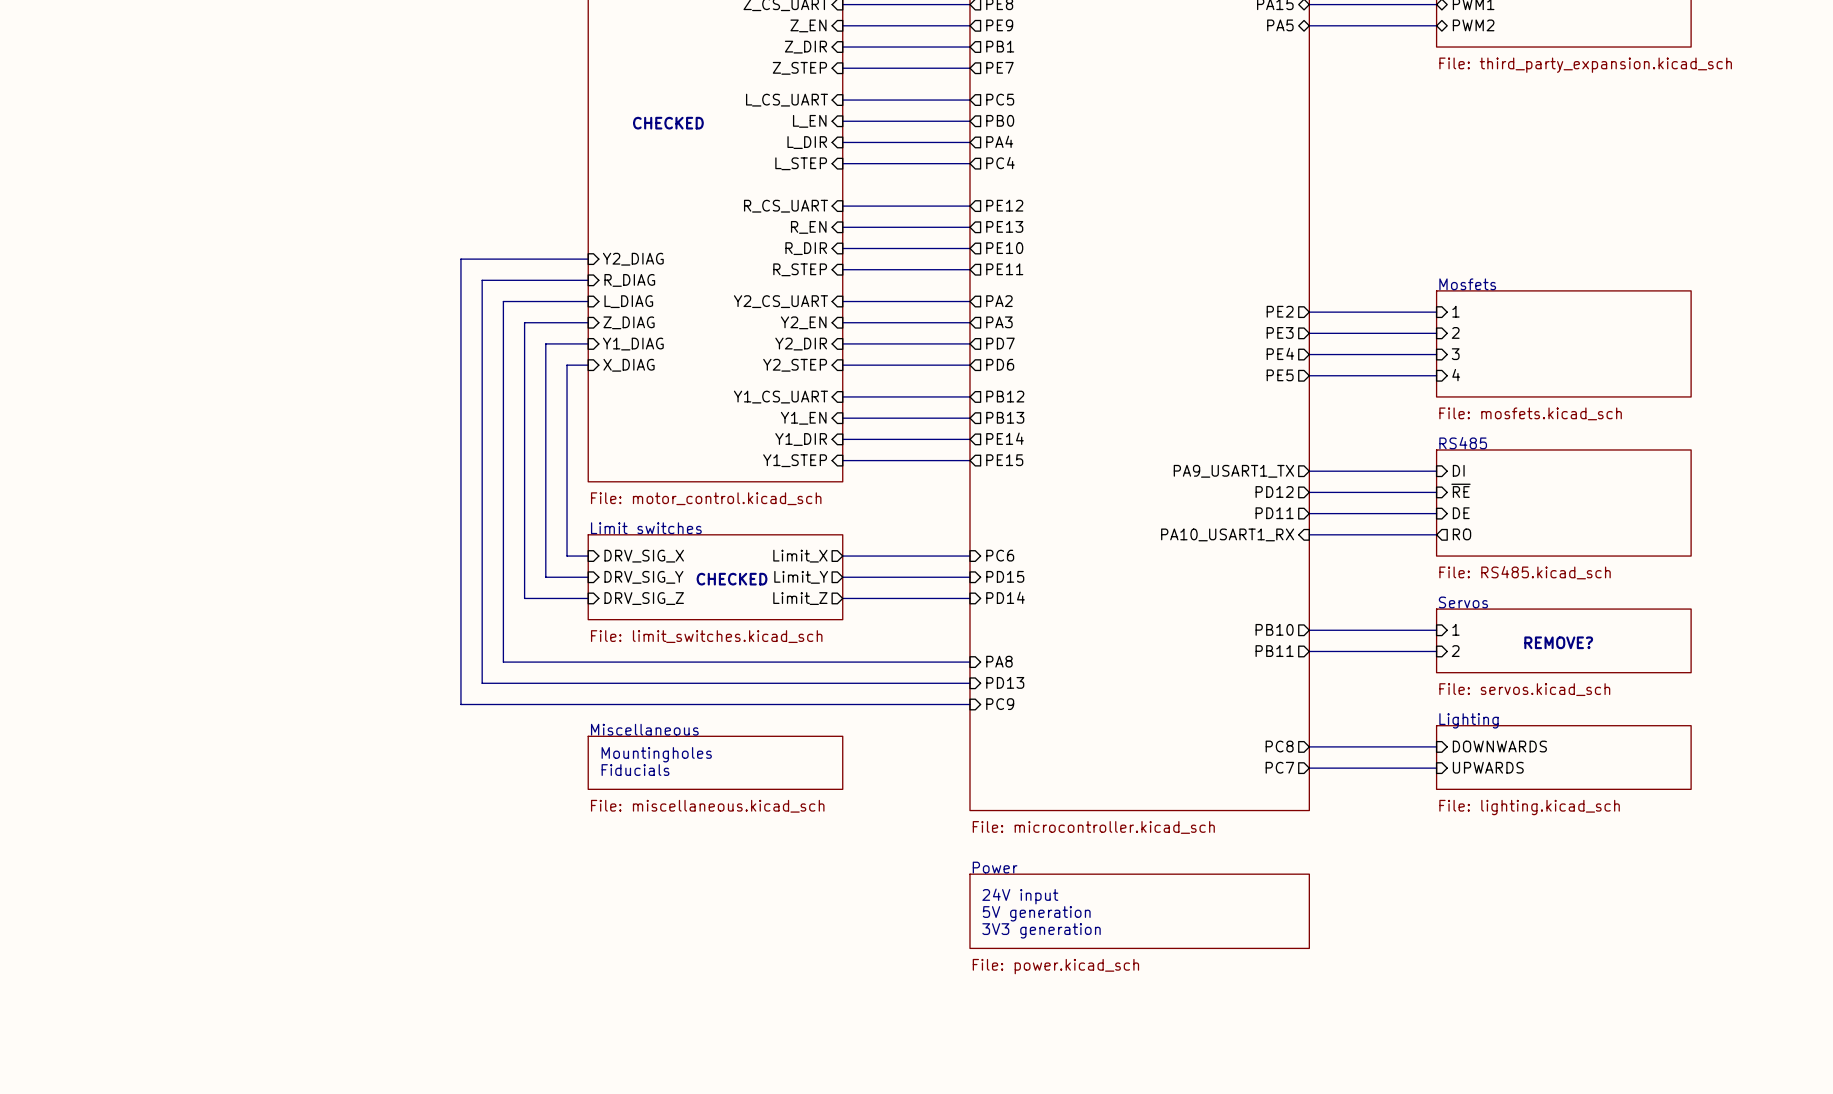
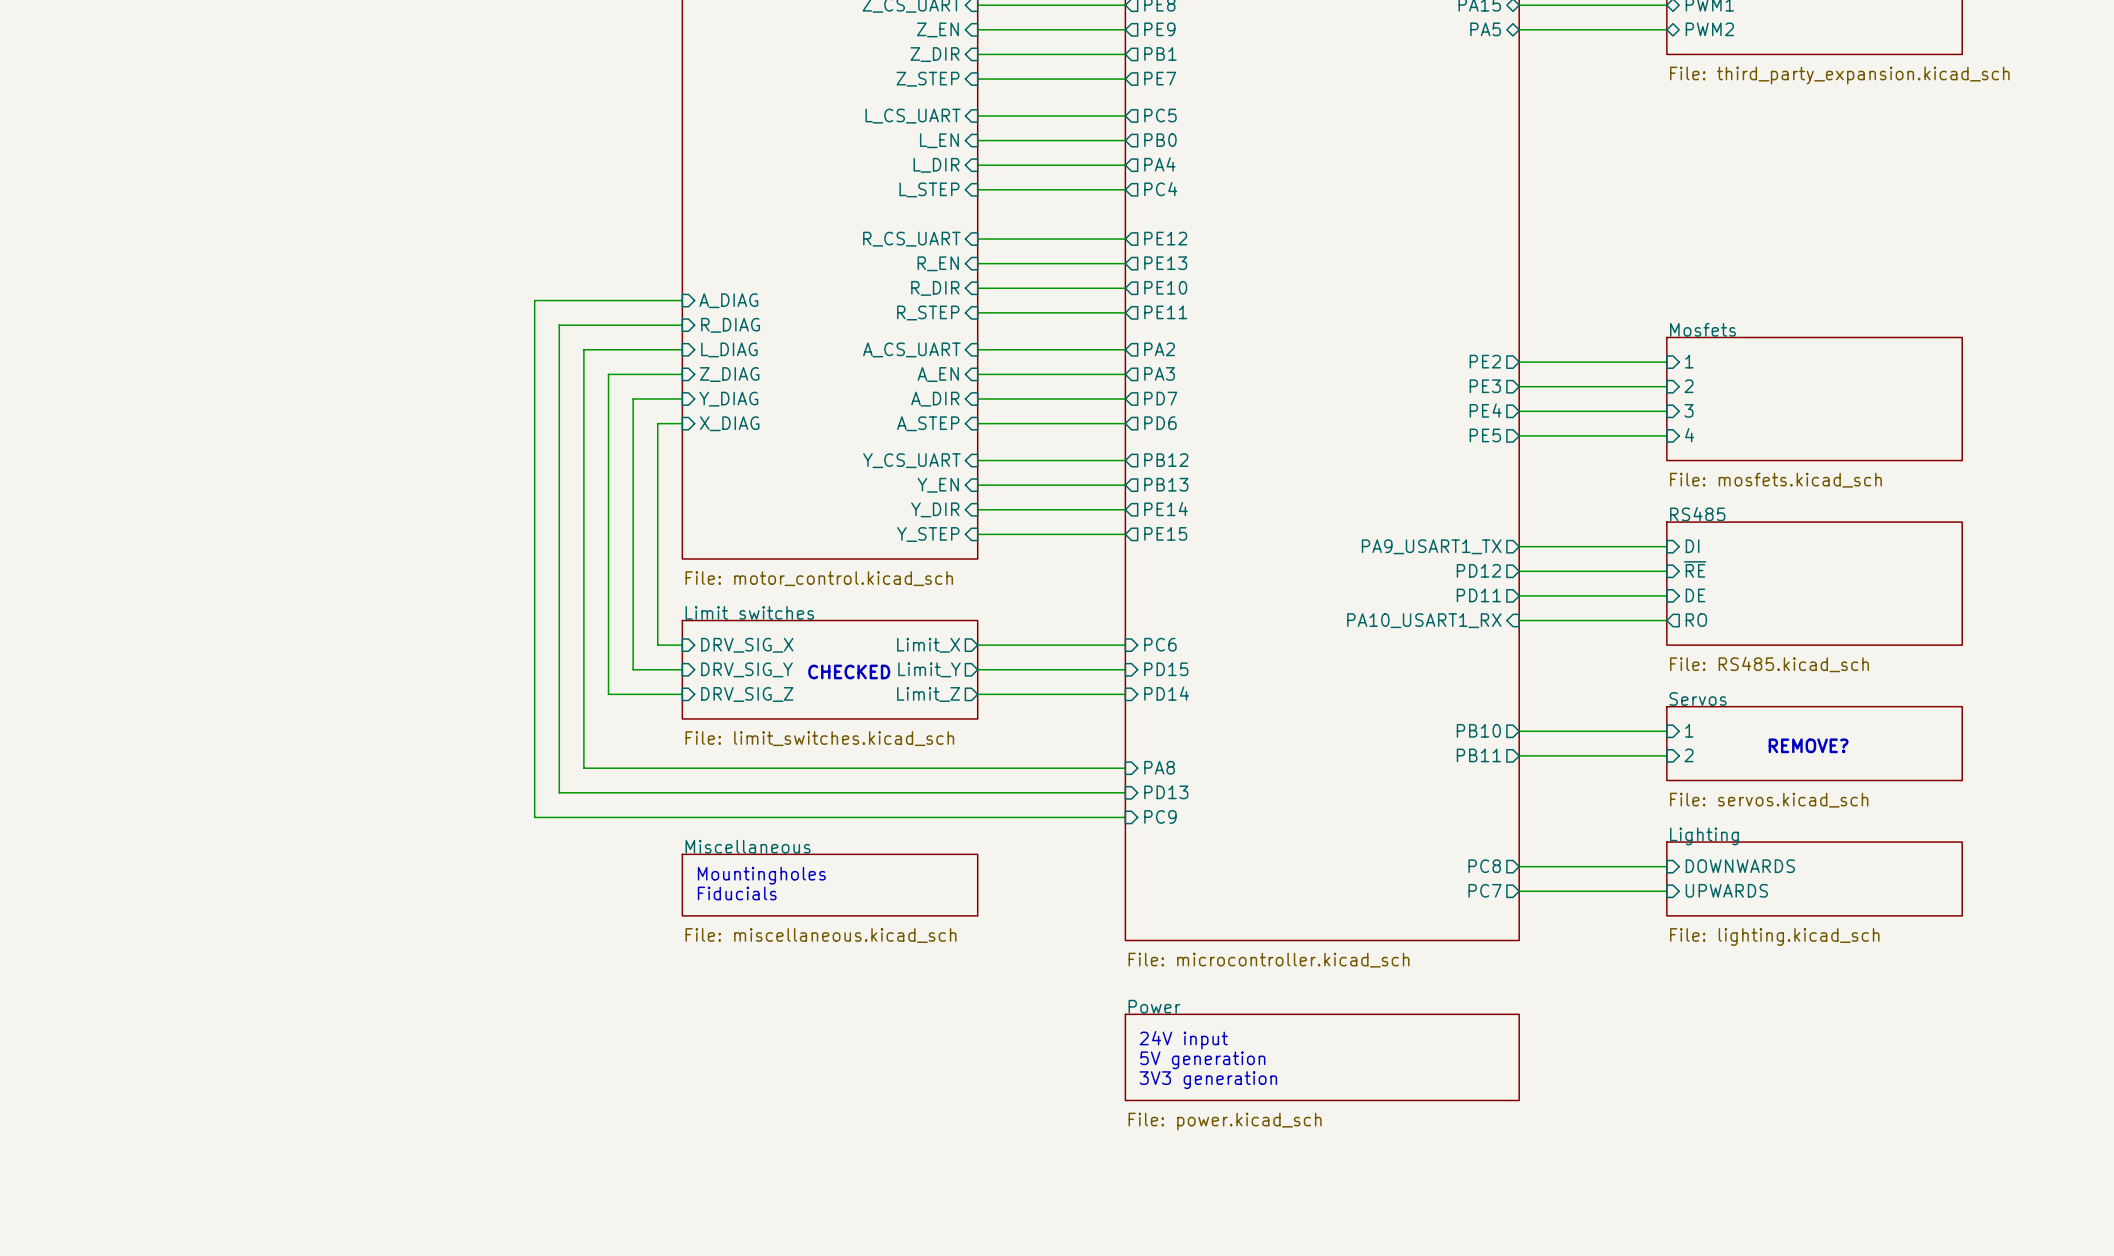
text: CHECKED (668, 123) -> none
sheet pin: Y2_DIAG (633, 259) -> A_DIAG (728, 300)
sheet pin: Y2_CS_UART (780, 301) -> A_CS_UART (911, 349)
sheet pin: Y2_EN (803, 322) -> A_EN (938, 374)
sheet pin: Y1_DIAG (633, 344) -> Y_DIAG (728, 399)
sheet pin: Y2_DIR (801, 344) -> A_DIR (935, 399)
sheet pin: Y2_STEP (795, 365) -> A_STEP (928, 423)
sheet pin: Y1_CS_UART (780, 397) -> Y_CS_UART (911, 460)
sheet pin: Y1_EN (803, 418) -> Y_EN (938, 485)
sheet pin: Y1_DIR (801, 439) -> Y_DIR (935, 509)
sheet pin: Y1_STEP (795, 460) -> Y_STEP (928, 534)

